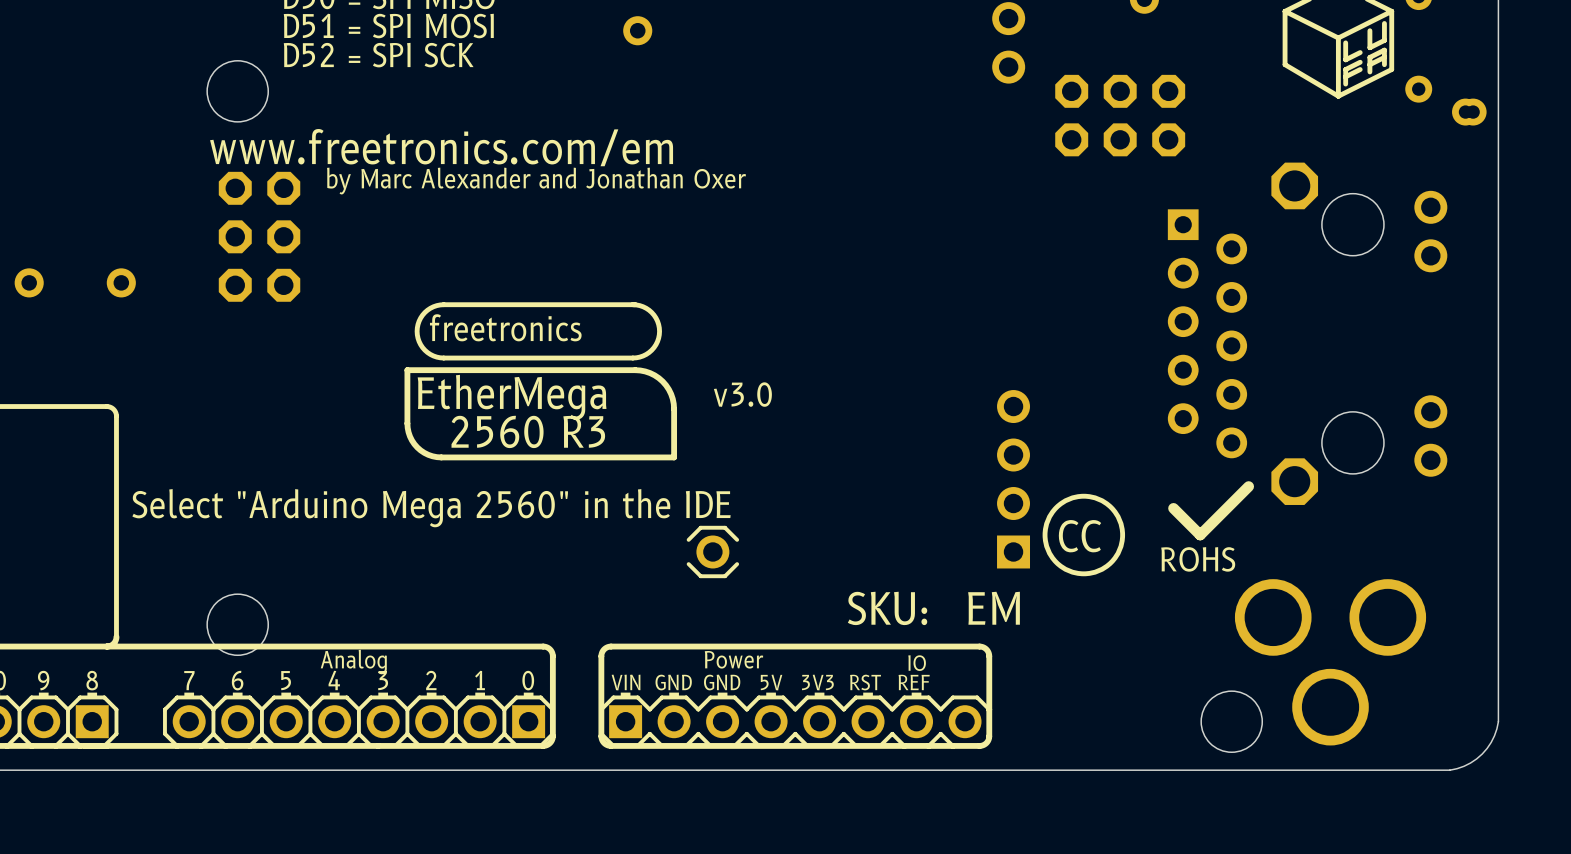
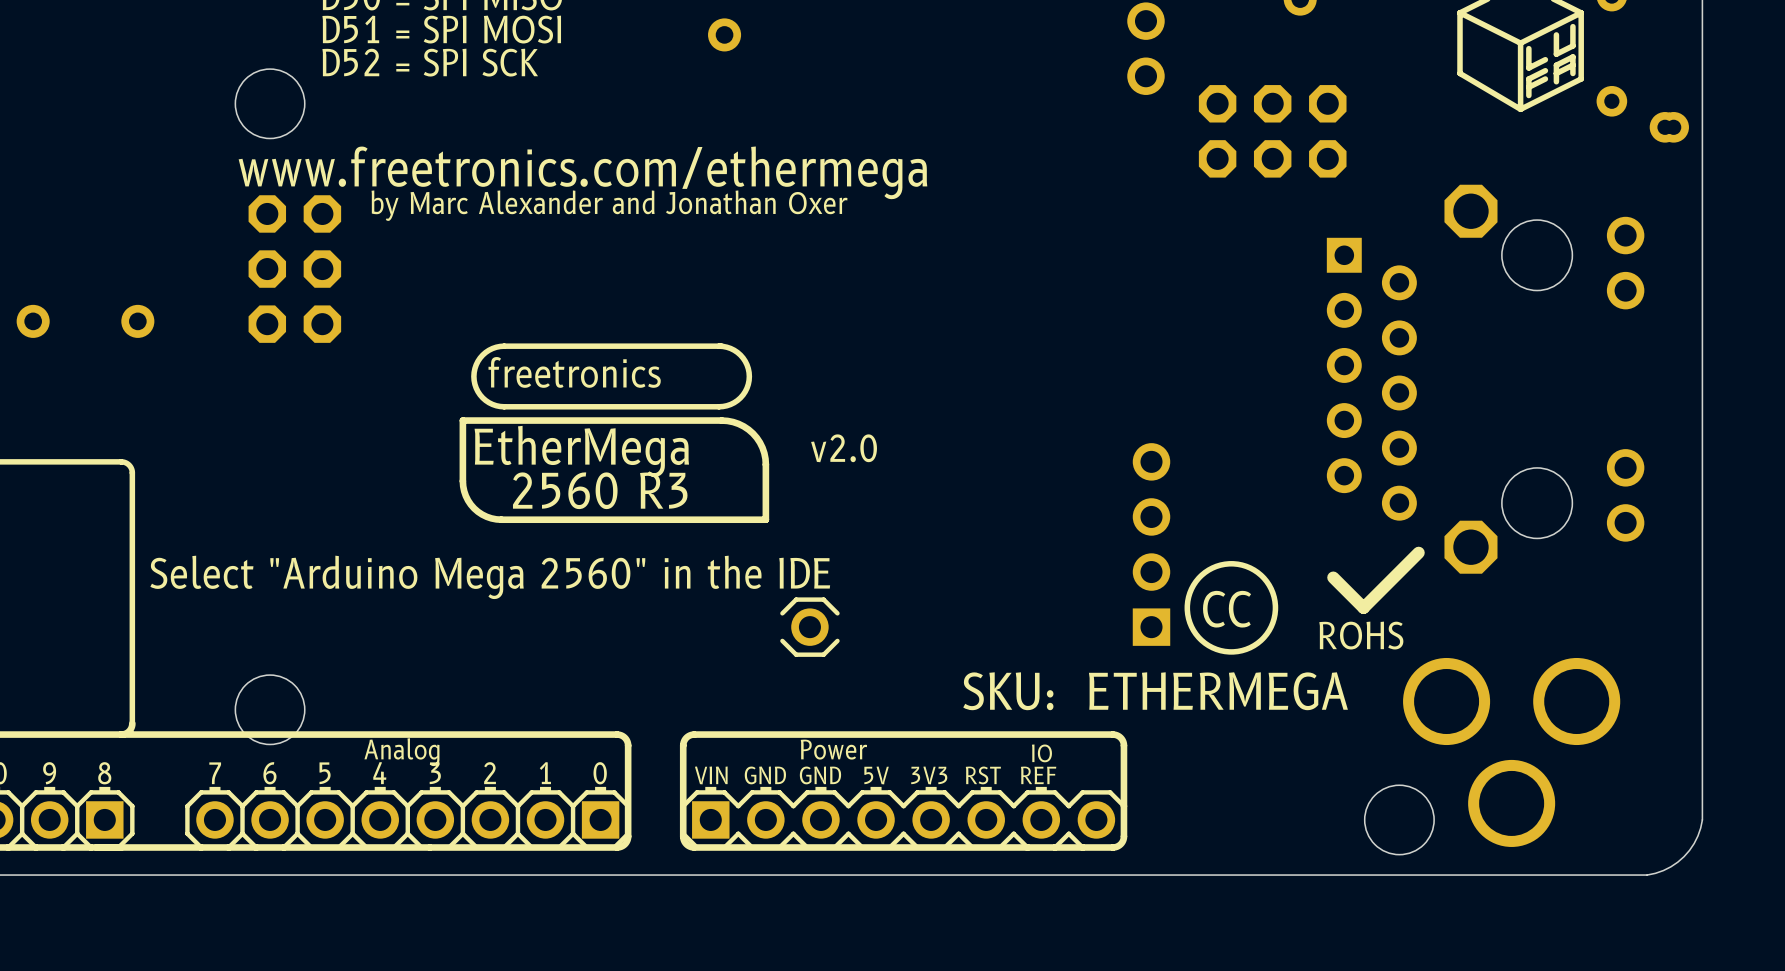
text: www.freetronics.com/em (441, 147) -> www.freetronics.com/ethermega (582, 172)
text: v3.0 (742, 394) -> v2.0 (844, 448)
text: EM (994, 608) -> ETHERMEGA (1218, 691)

